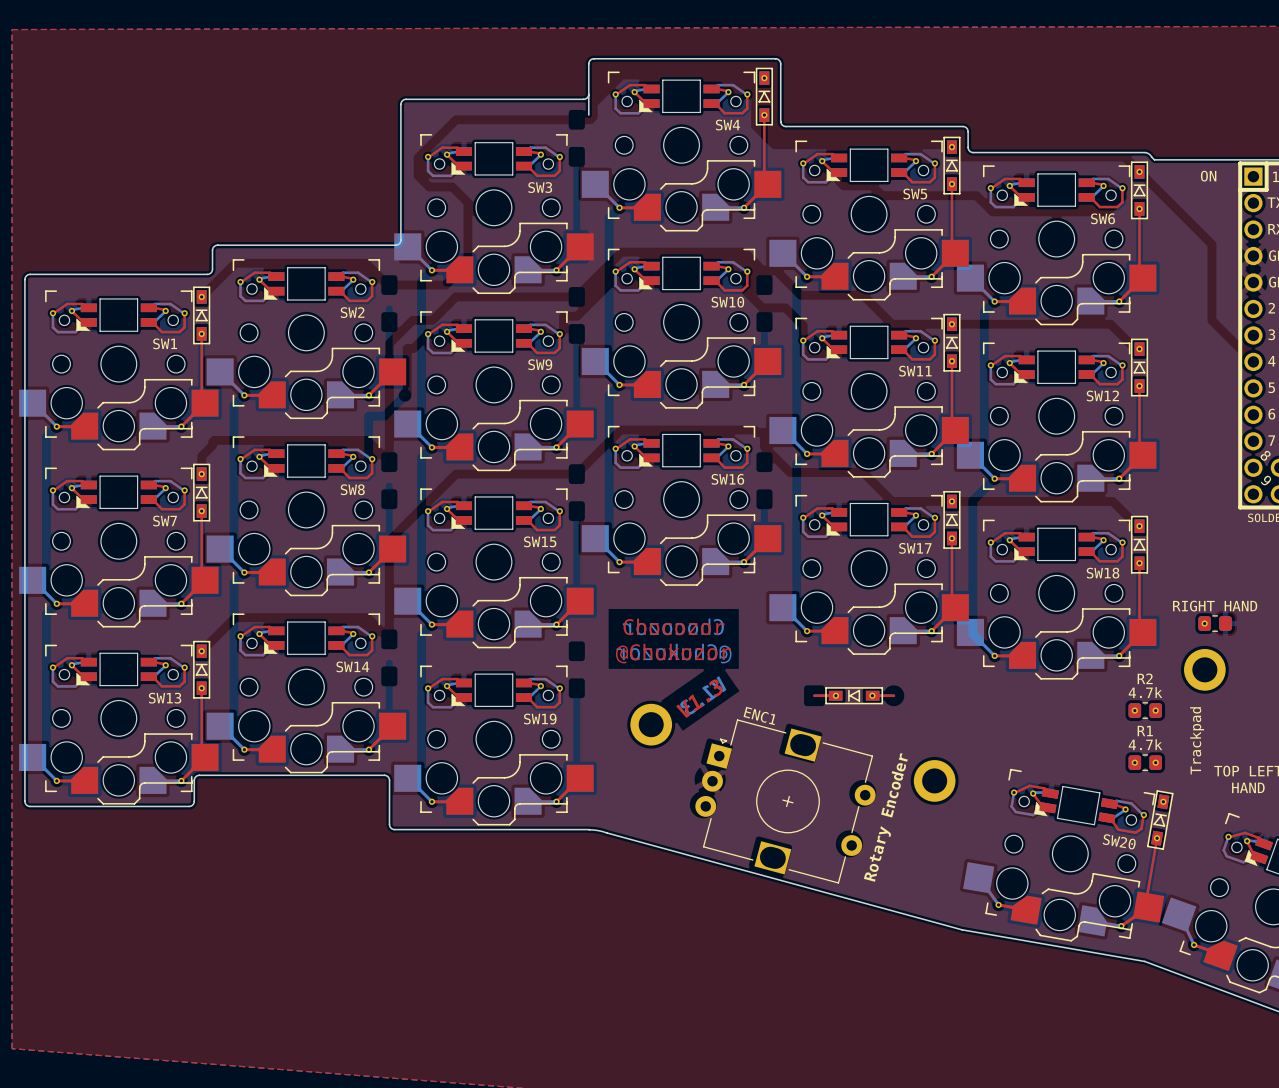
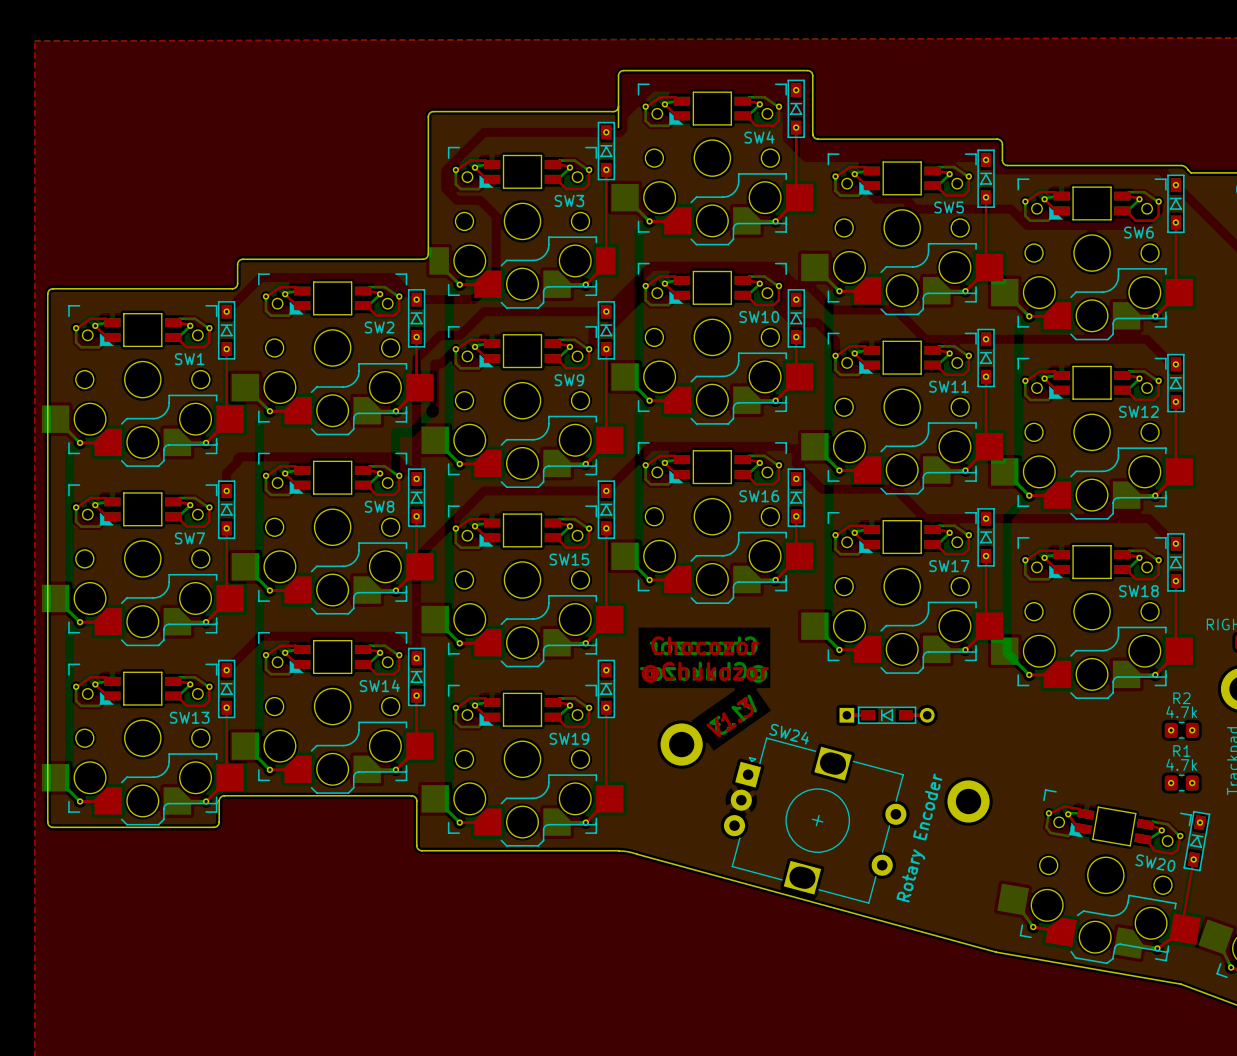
SW3 footprint: [394, 134, 594, 295] -> [429, 121, 616, 309]
SW10 footprint: [581, 248, 782, 409] -> [611, 262, 814, 425]
SW2 footprint: [206, 259, 407, 420] -> [231, 273, 434, 436]
SW9 footprint: [394, 311, 594, 472] -> [421, 301, 624, 488]
SW16 footprint: [581, 425, 782, 586] -> [611, 442, 814, 605]
SW8 footprint: [206, 436, 407, 597] -> [231, 452, 434, 615]
SW15 footprint: [394, 488, 594, 649] -> [421, 480, 624, 668]
SW14 footprint: [206, 613, 407, 774] -> [231, 631, 434, 794]
SW19 footprint: [394, 665, 594, 826] -> [421, 659, 624, 847]
part footprint: [825, 687, 884, 705] -> [839, 706, 935, 724]
SW24: none -> (815, 820)
ENC1: (785, 801) -> none

